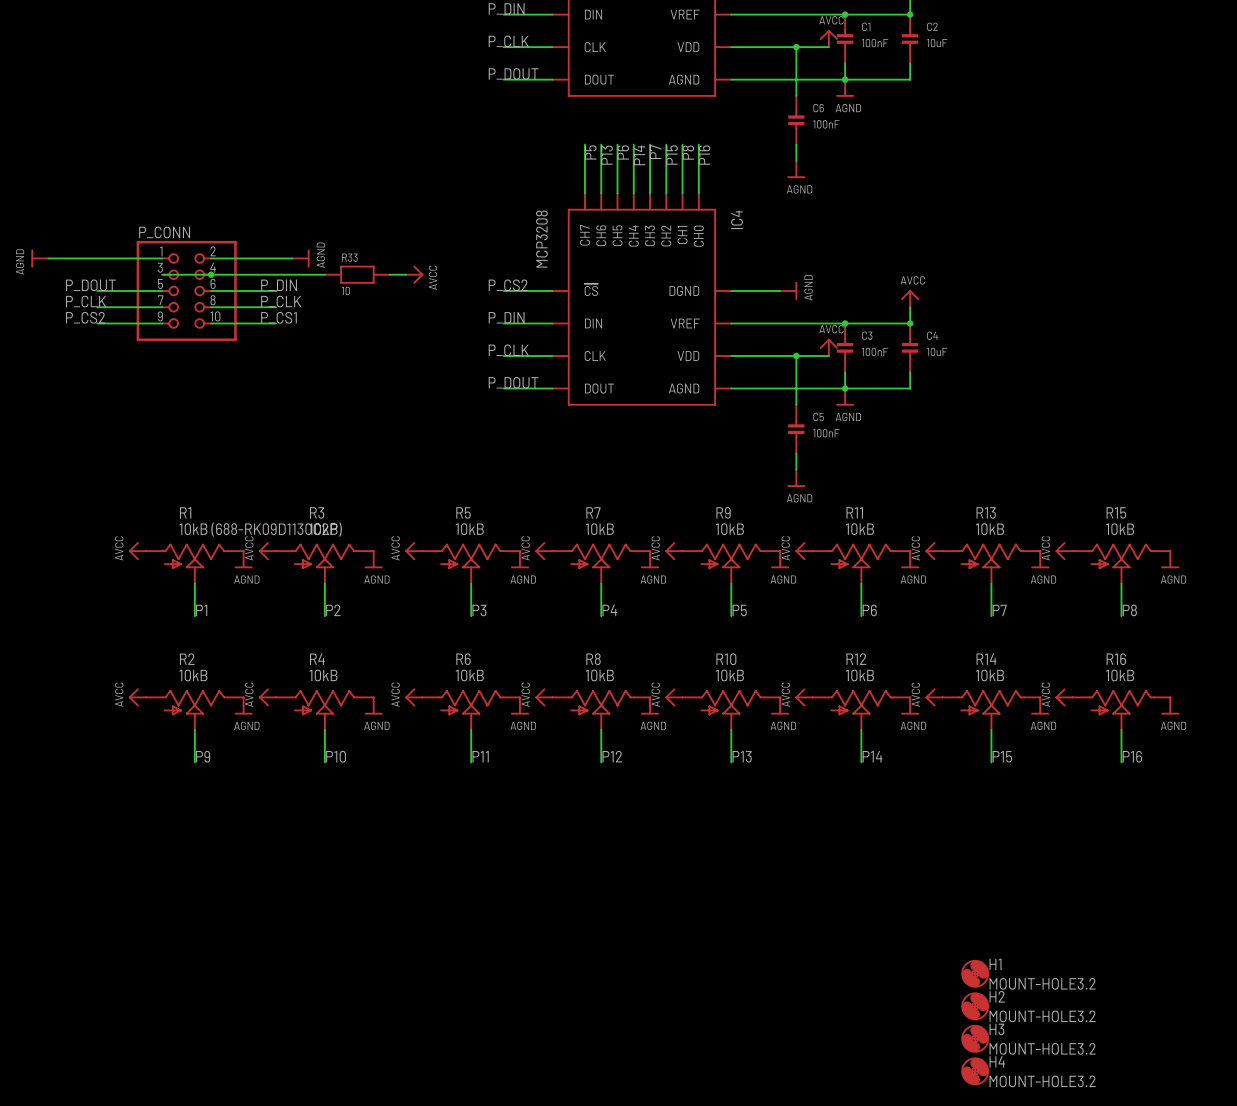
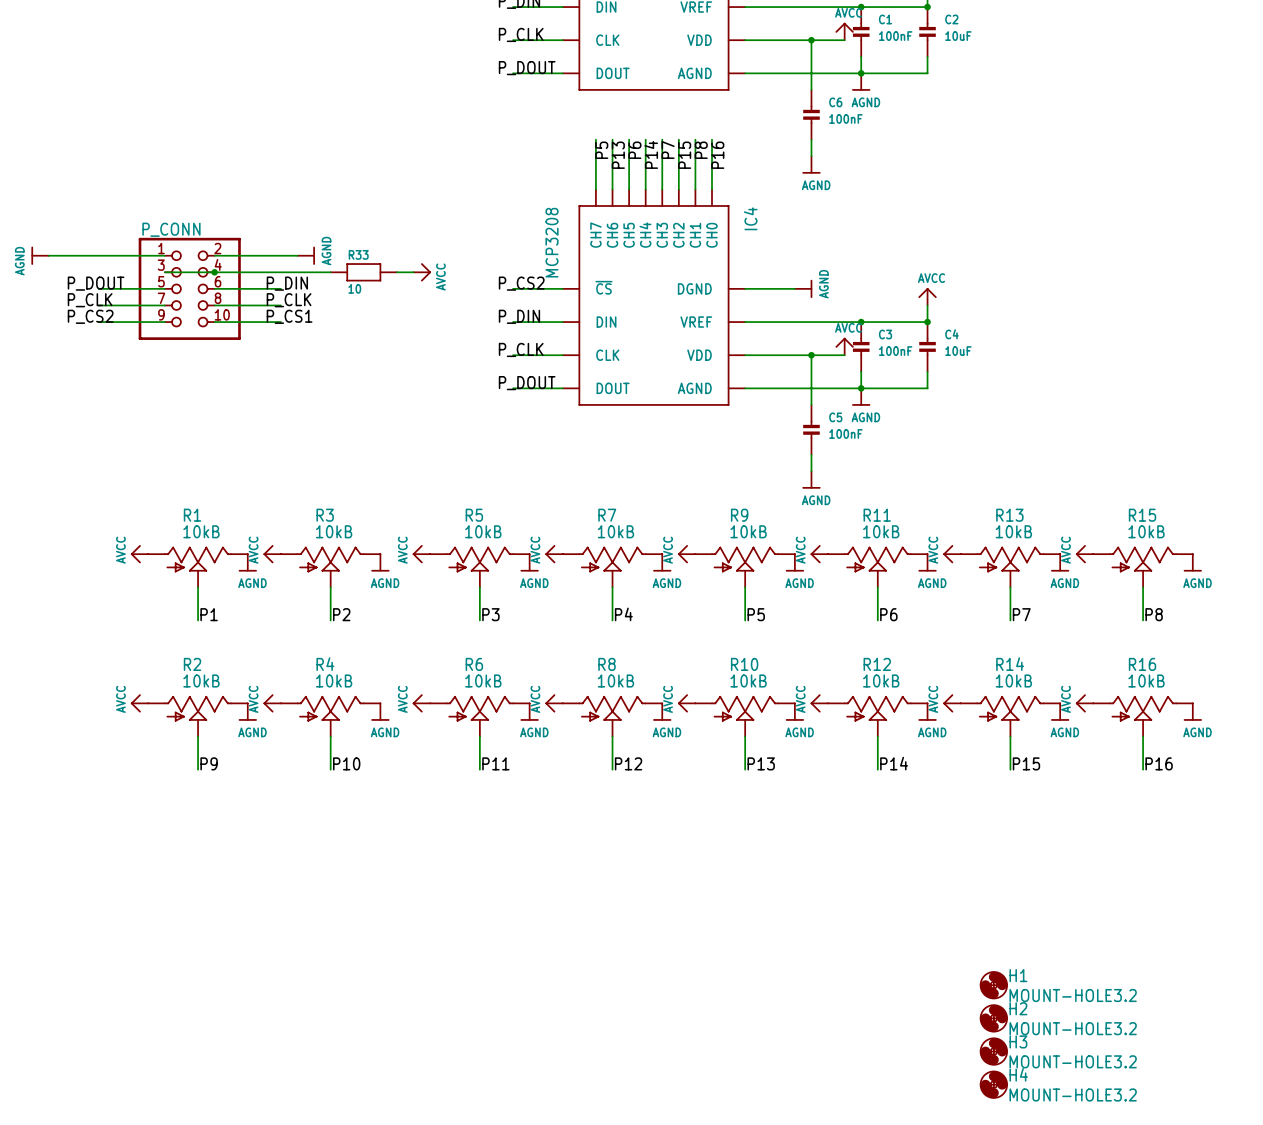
R1 value: 10kB (688-RK09D1130C2P) (260, 529) -> 10kB (201, 531)

